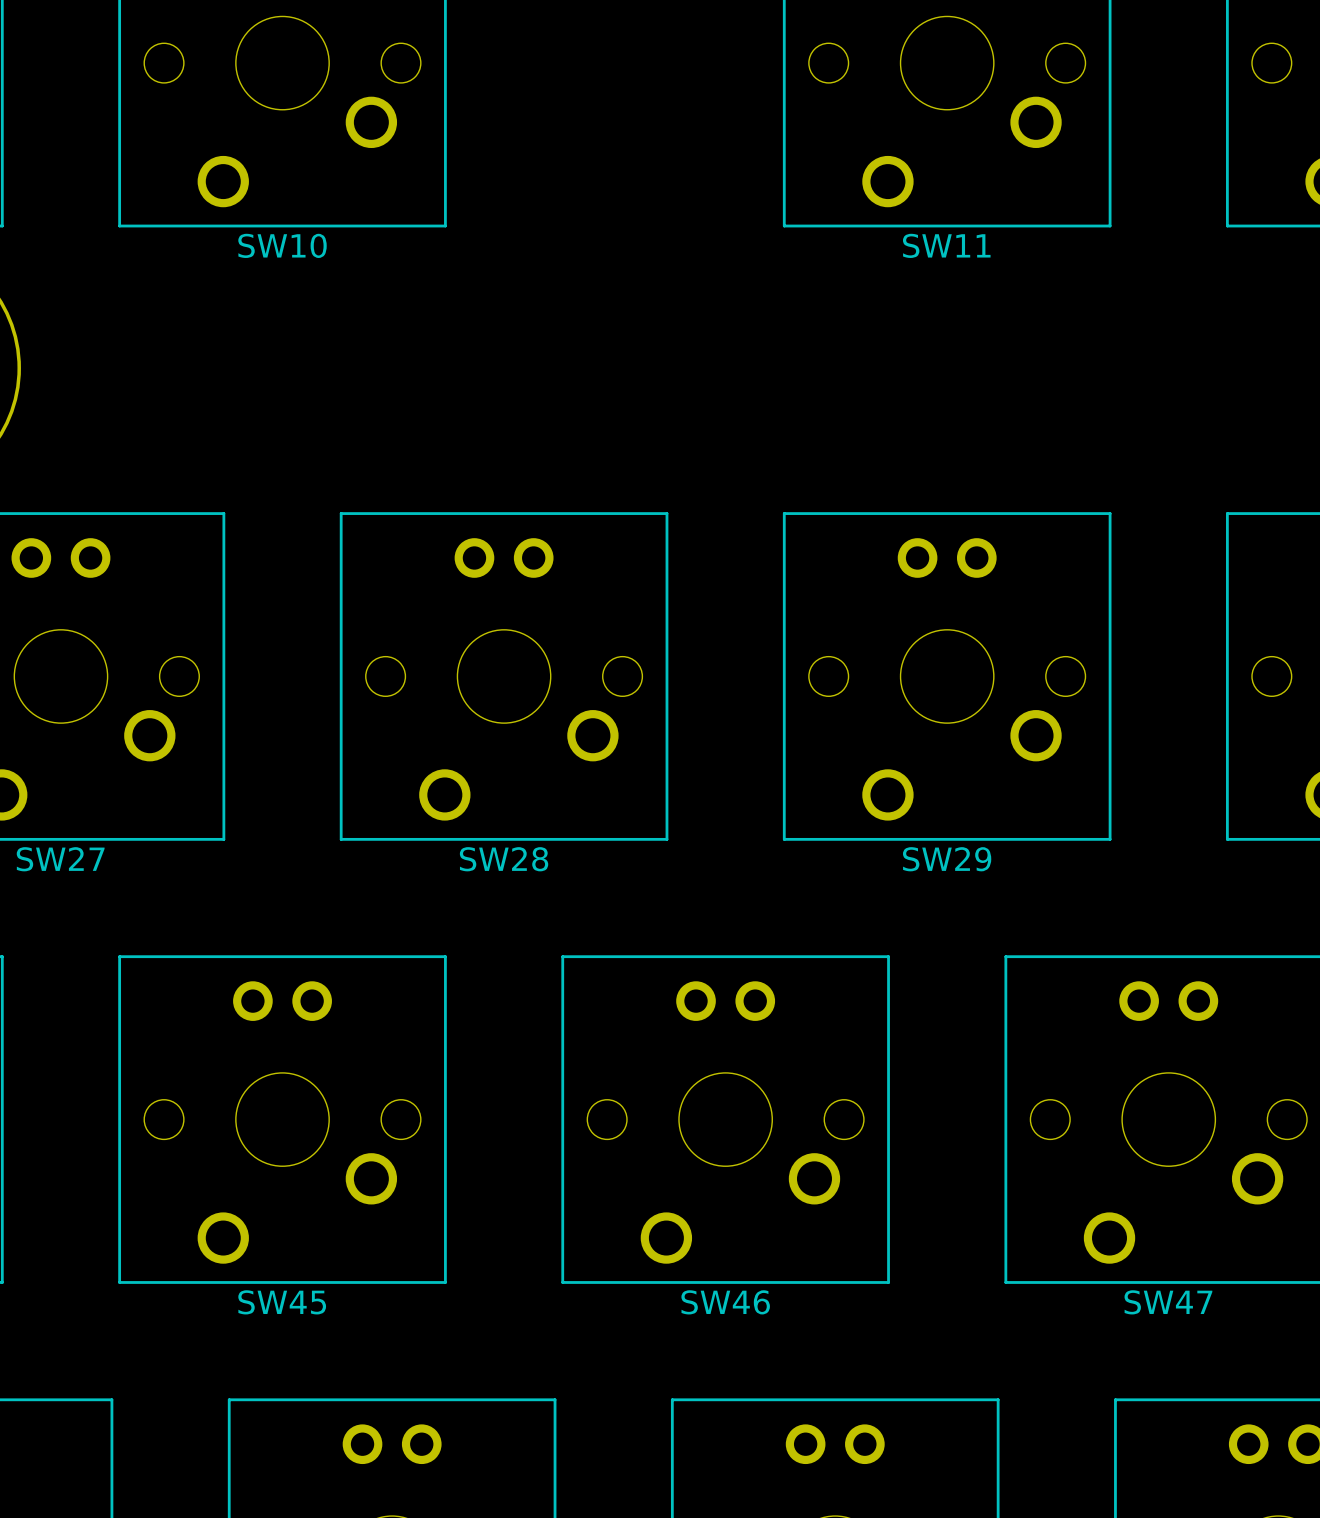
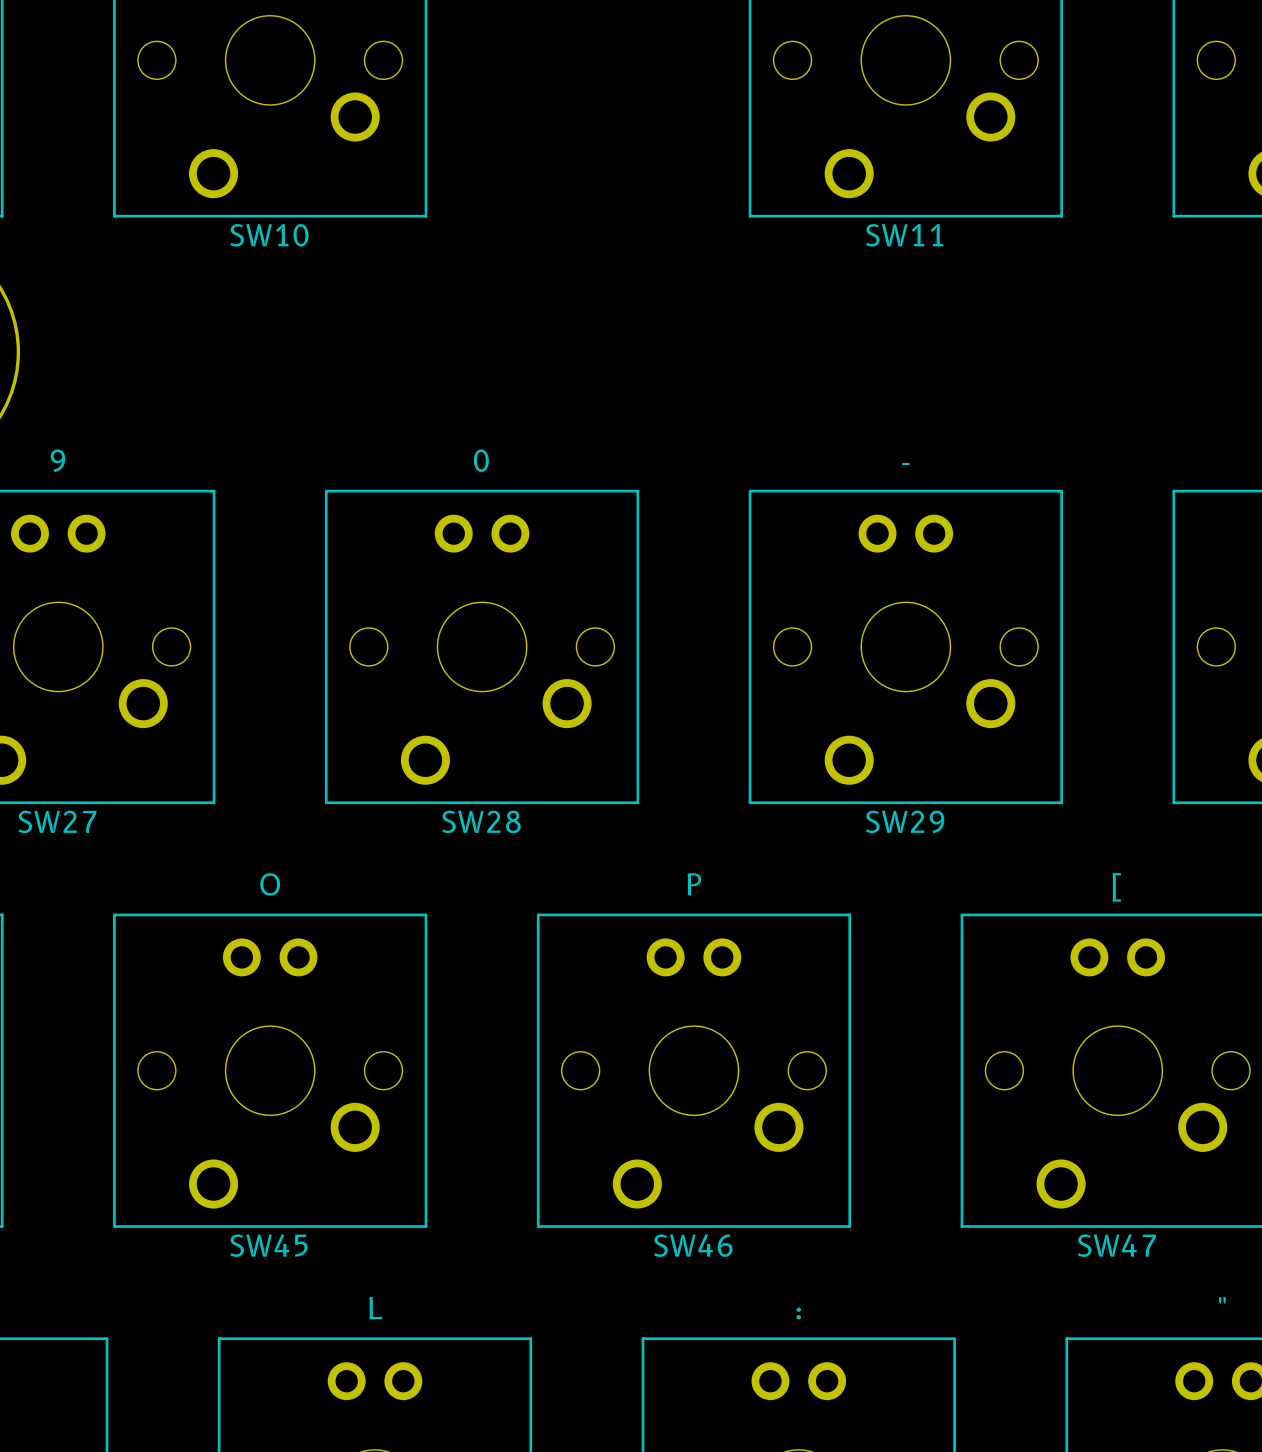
SW27 value: none -> 9 (57, 460)
SW28 value: none -> 0 (481, 460)
SW29 value: none -> - (905, 464)
SW45 value: none -> O (270, 884)
SW46 value: none -> P (694, 884)
SW47 value: none -> [ (1116, 887)
part value: none -> " (1222, 1300)
part value: none -> L (375, 1308)
part value: none -> : (798, 1313)

